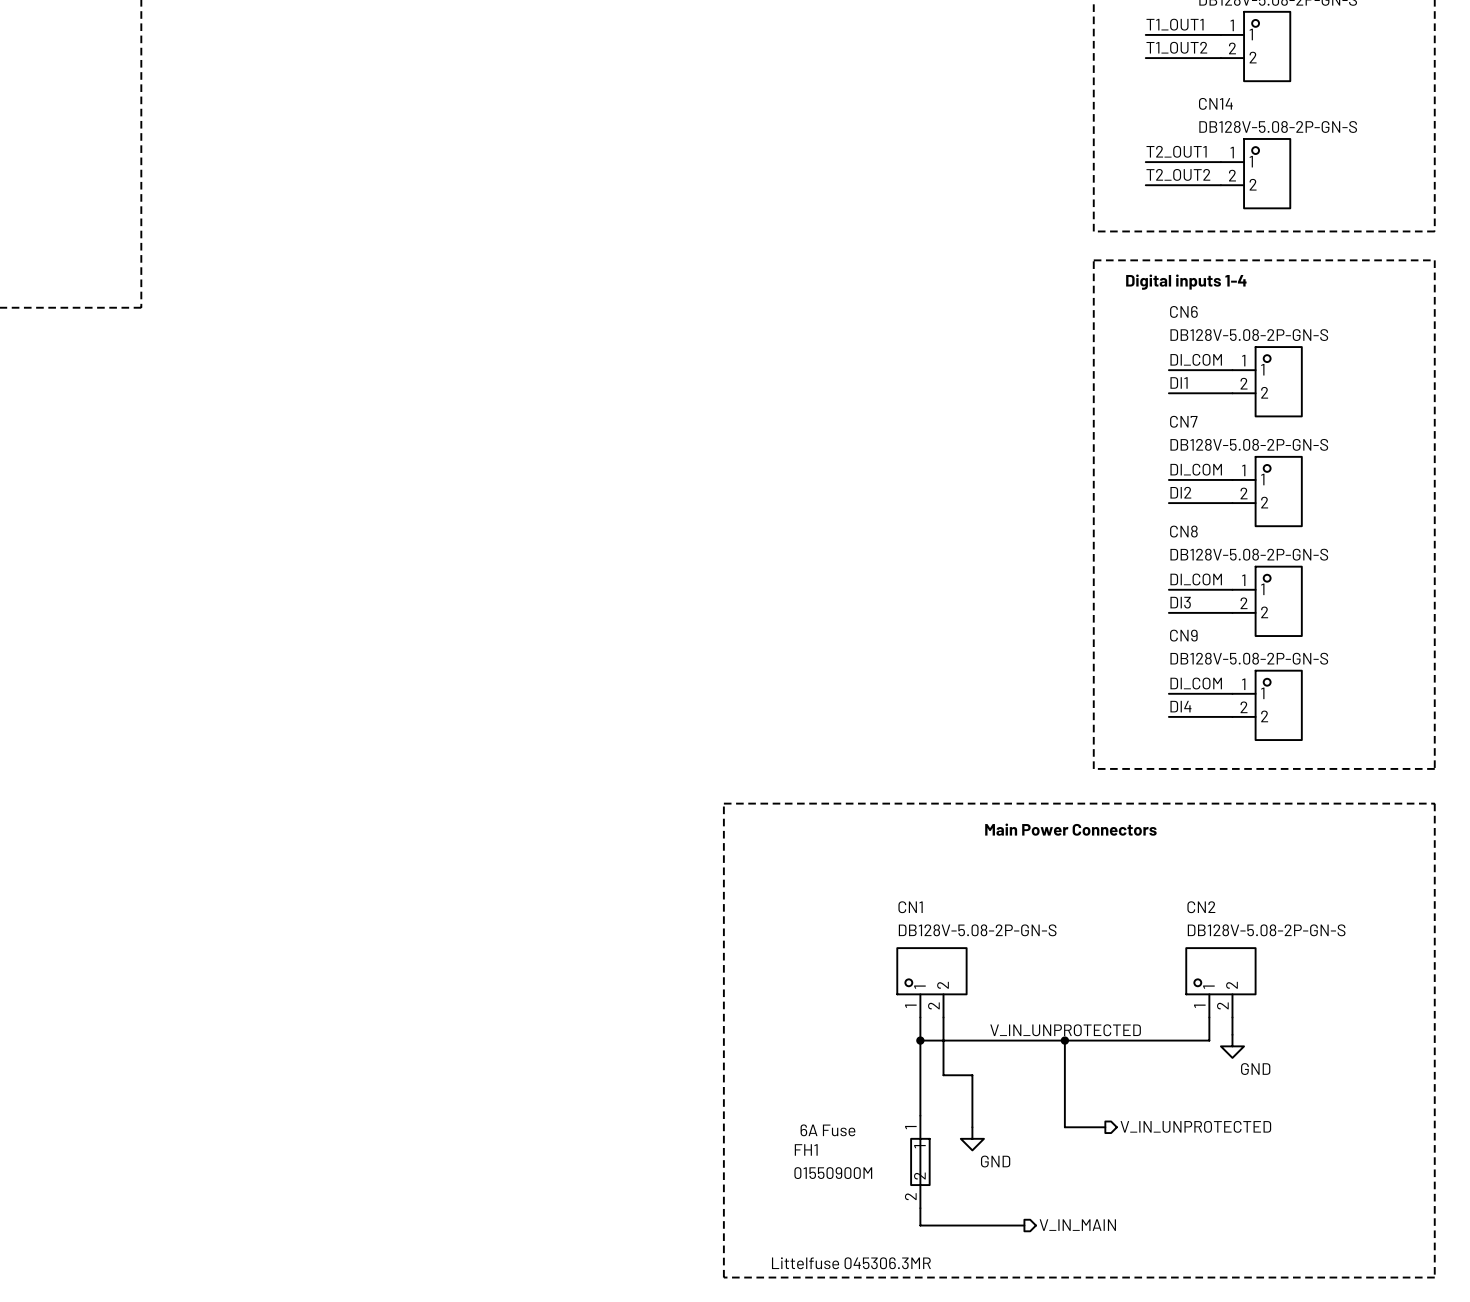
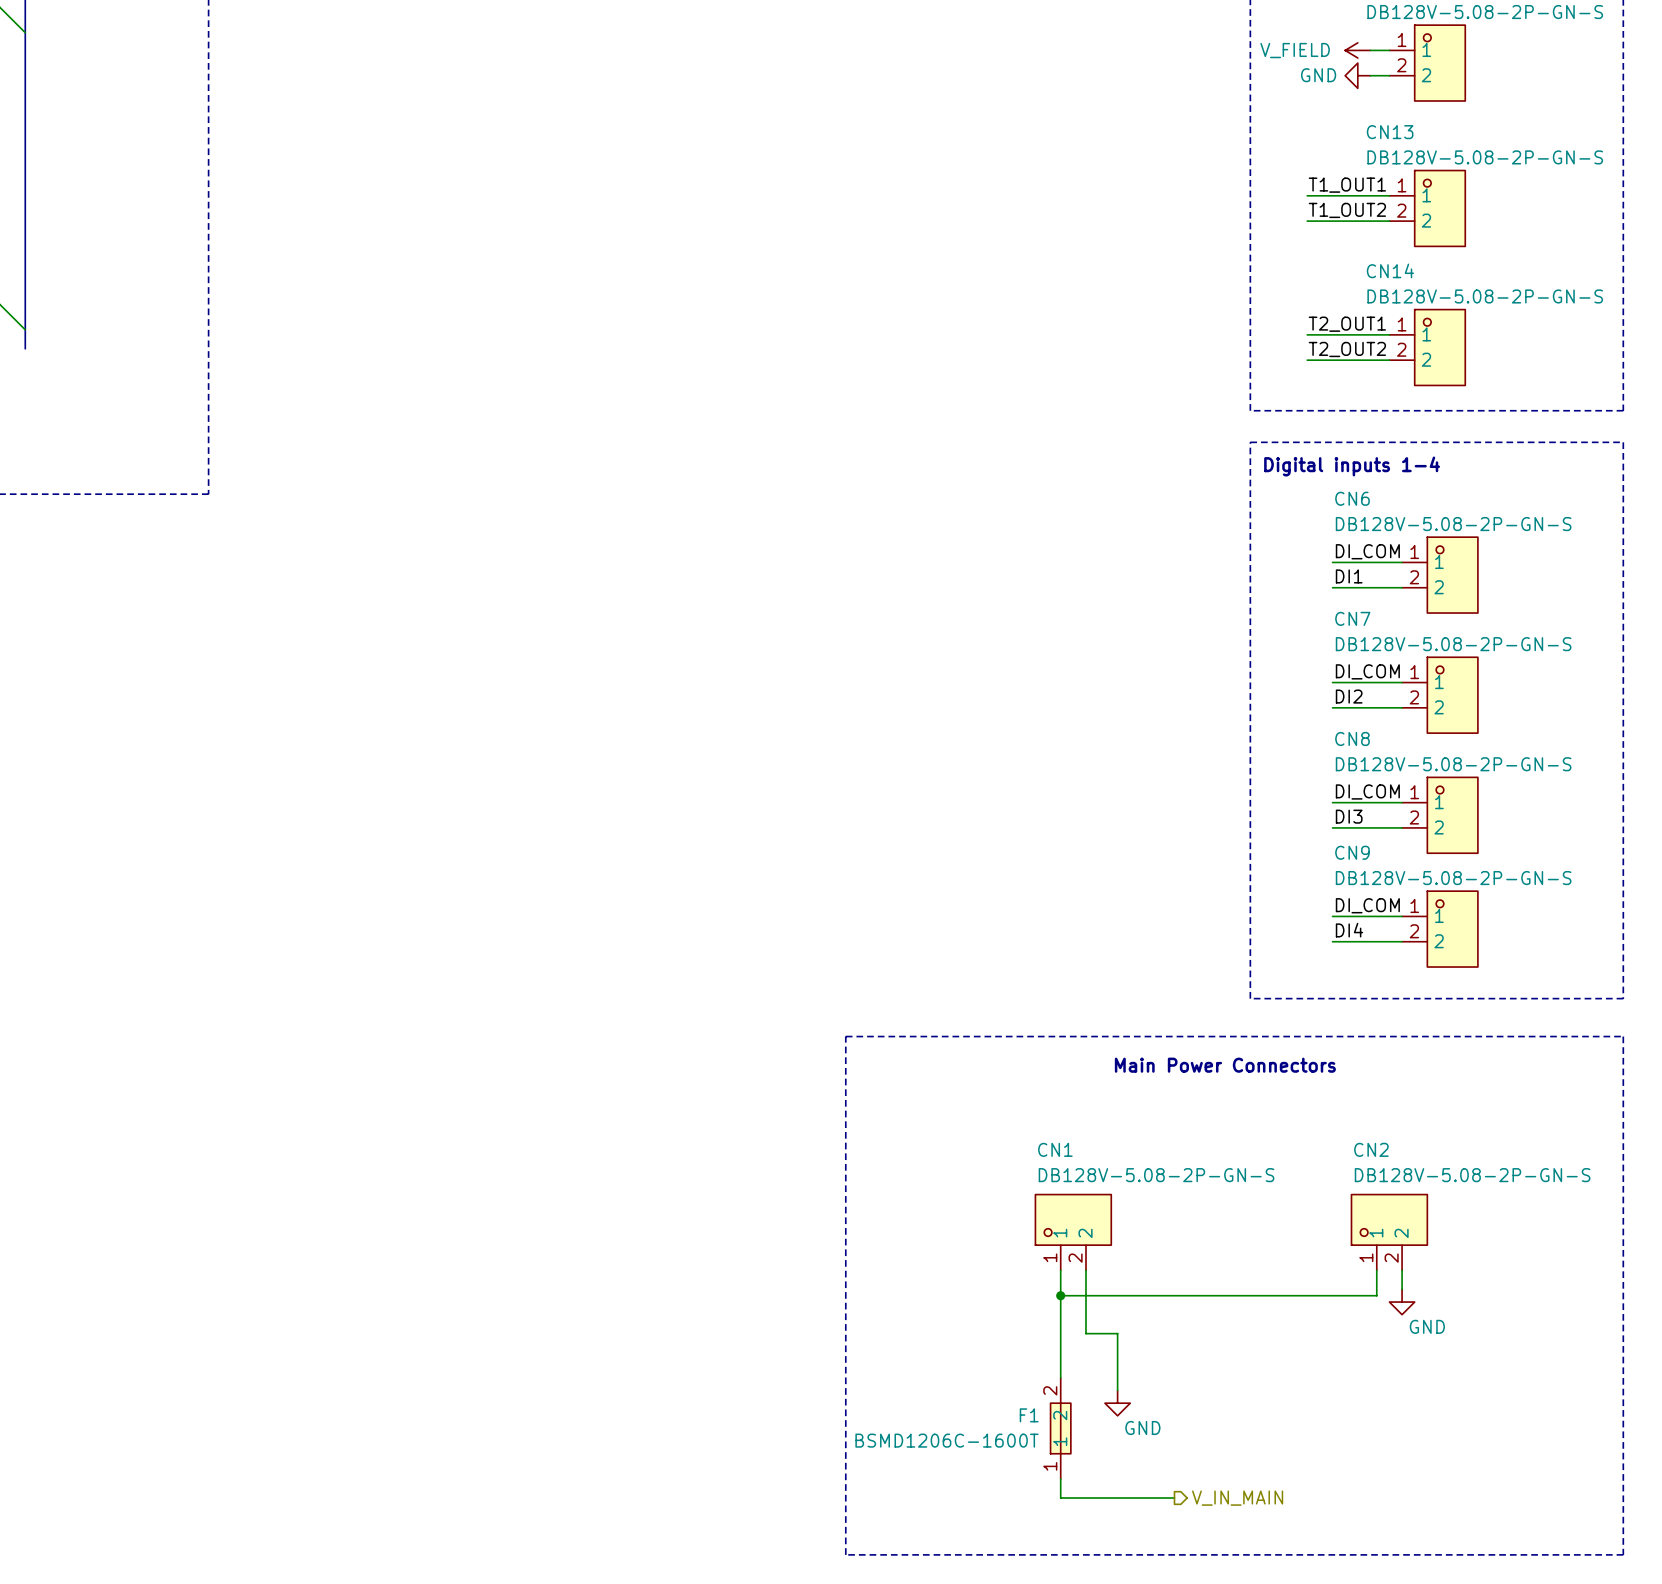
label: V_IN_UNPROTECTED (1065, 1030) -> none
wire: (1064, 1040) (1064, 1127) (1105, 1127) -> none
junction: (1064, 1040) -> none
hierarchical label: V_IN_UNPROTECTED (1195, 1126) -> none
text: 6A Fuse (827, 1130) -> none
FH1 name: FH1 (806, 1149) -> F1 (1029, 1415)
FH1 rotation: 0° (920, 1161) -> 180° (1060, 1428)
FH1 value: 01550900M (833, 1173) -> BSMD1206C-1600T (947, 1440)
text: Littelfuse 045306.3MR (851, 1263) -> none

